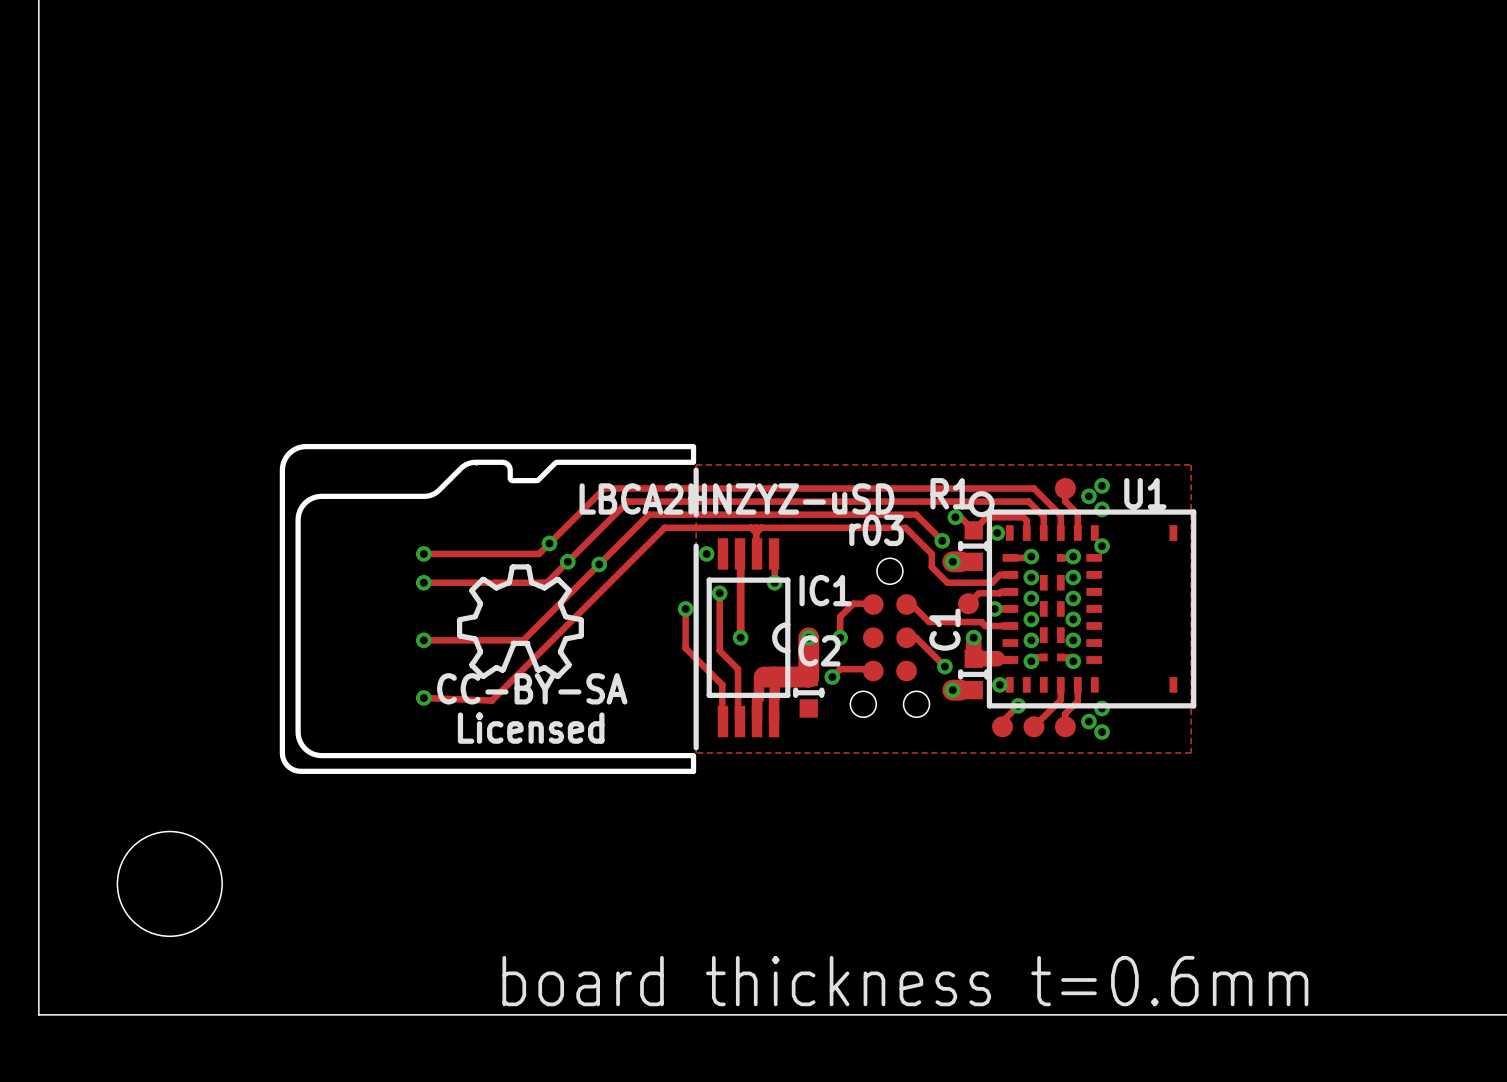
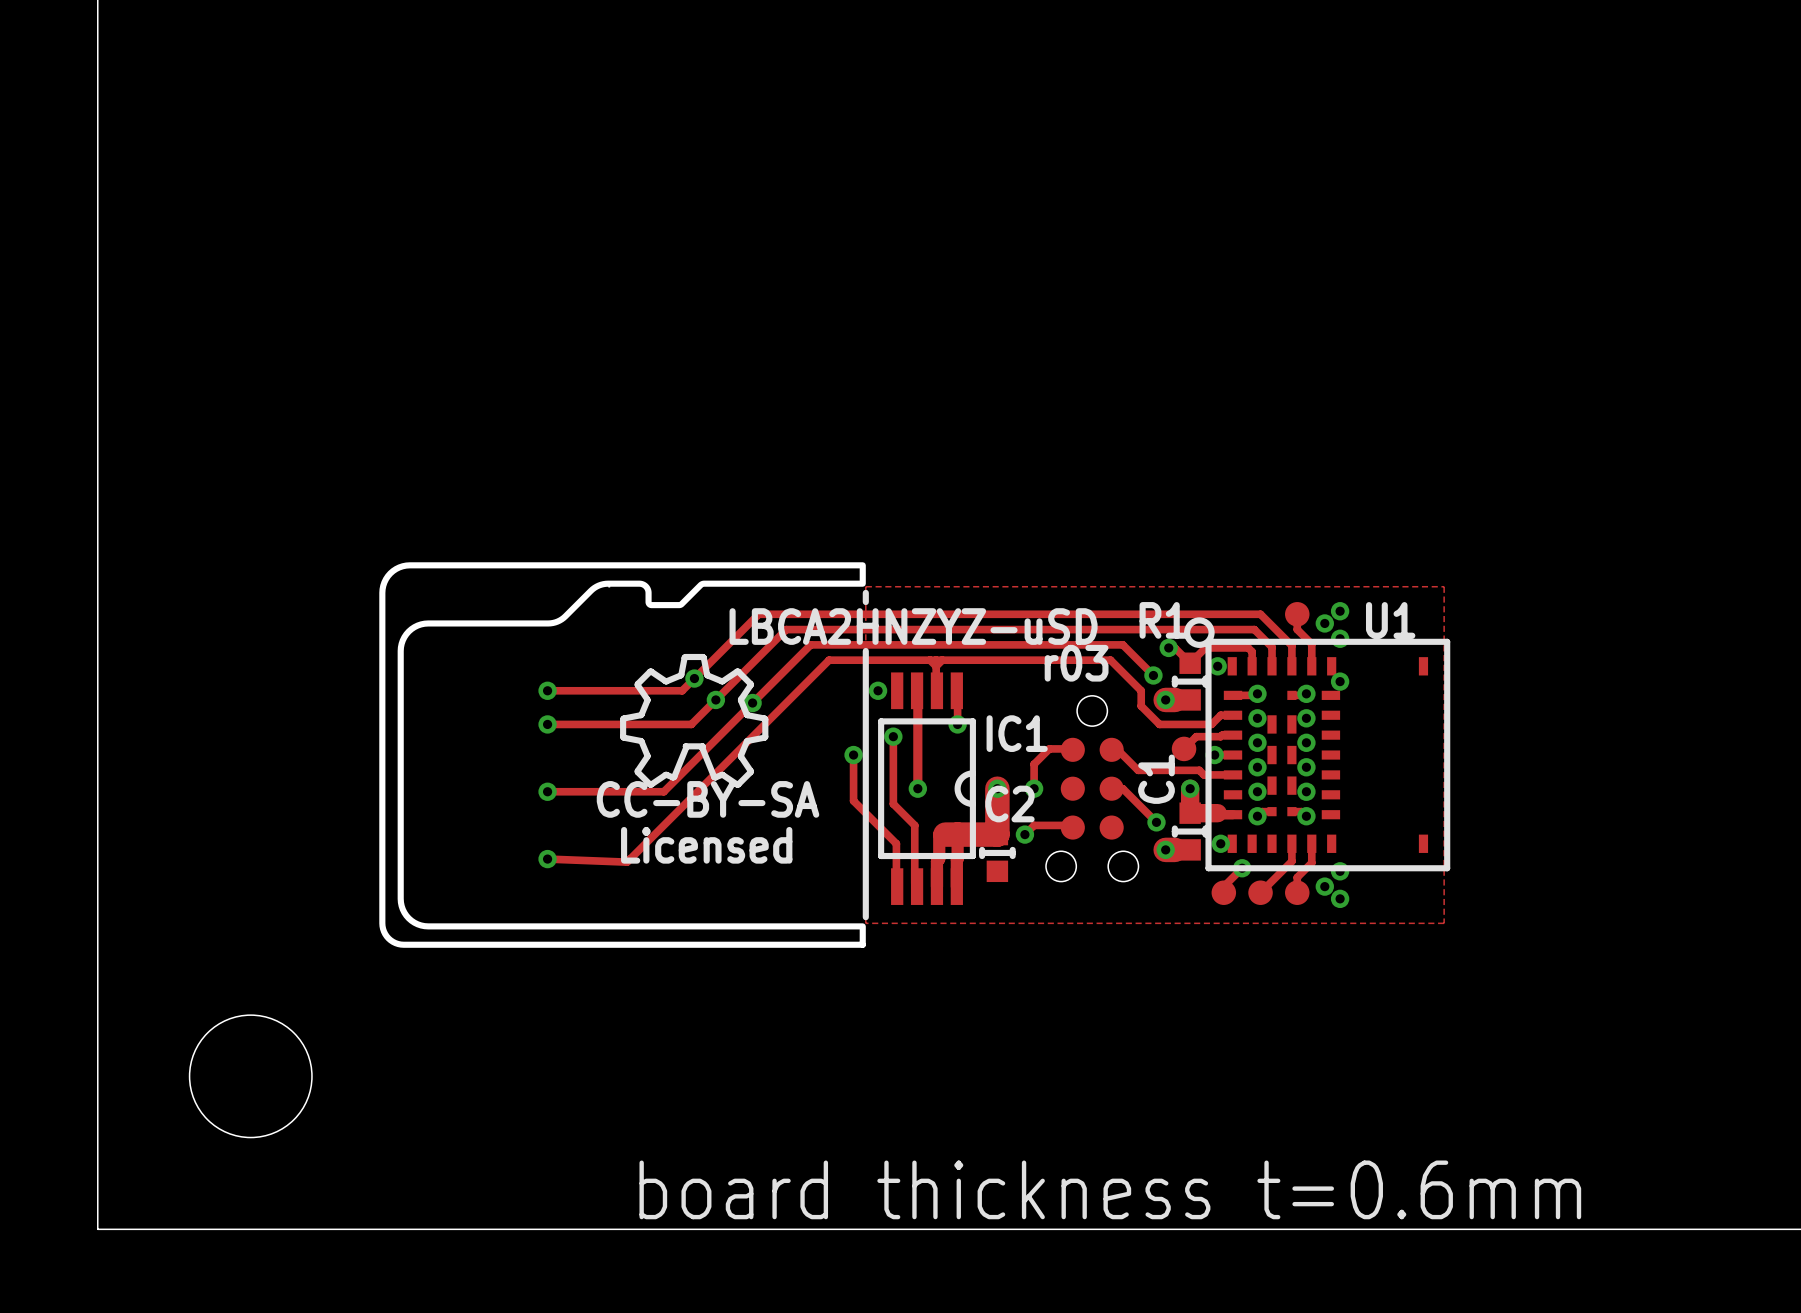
line: (696, 478) (696, 514) -> none
line: none -> (865, 651) (865, 681)
line: (513, 566) (508, 582) (496, 587) (482, 579) (472, 590) (480, 604) (474, 616) (459, 620) (459, 635) (475, 639) (480, 652) (472, 665) (482, 676) (496, 667) (503, 669) (513, 643) (527, 643) (537, 669) (544, 667) (558, 676) (568, 665) (560, 652) (565, 639) (581, 635) (581, 620) (566, 616) (560, 604) (568, 590) (557, 579) (544, 587) (531, 582) (527, 566) (513, 566) -> (685, 656) (680, 675) (665, 681) (650, 671) (637, 683) (647, 700) (640, 715) (623, 719) (623, 736) (641, 741) (647, 756) (637, 772) (650, 784) (665, 774) (674, 777) (685, 746) (702, 746) (714, 777) (722, 774) (738, 784) (750, 772) (741, 756) (746, 741) (765, 736) (765, 719) (747, 715) (740, 700) (750, 683) (738, 671) (722, 681) (707, 675) (703, 657) (685, 656)
text position: CC-BY-SA (532, 688) -> CC-BY-SA (708, 799)
text position: Licensed (531, 728) -> Licensed (706, 845)

